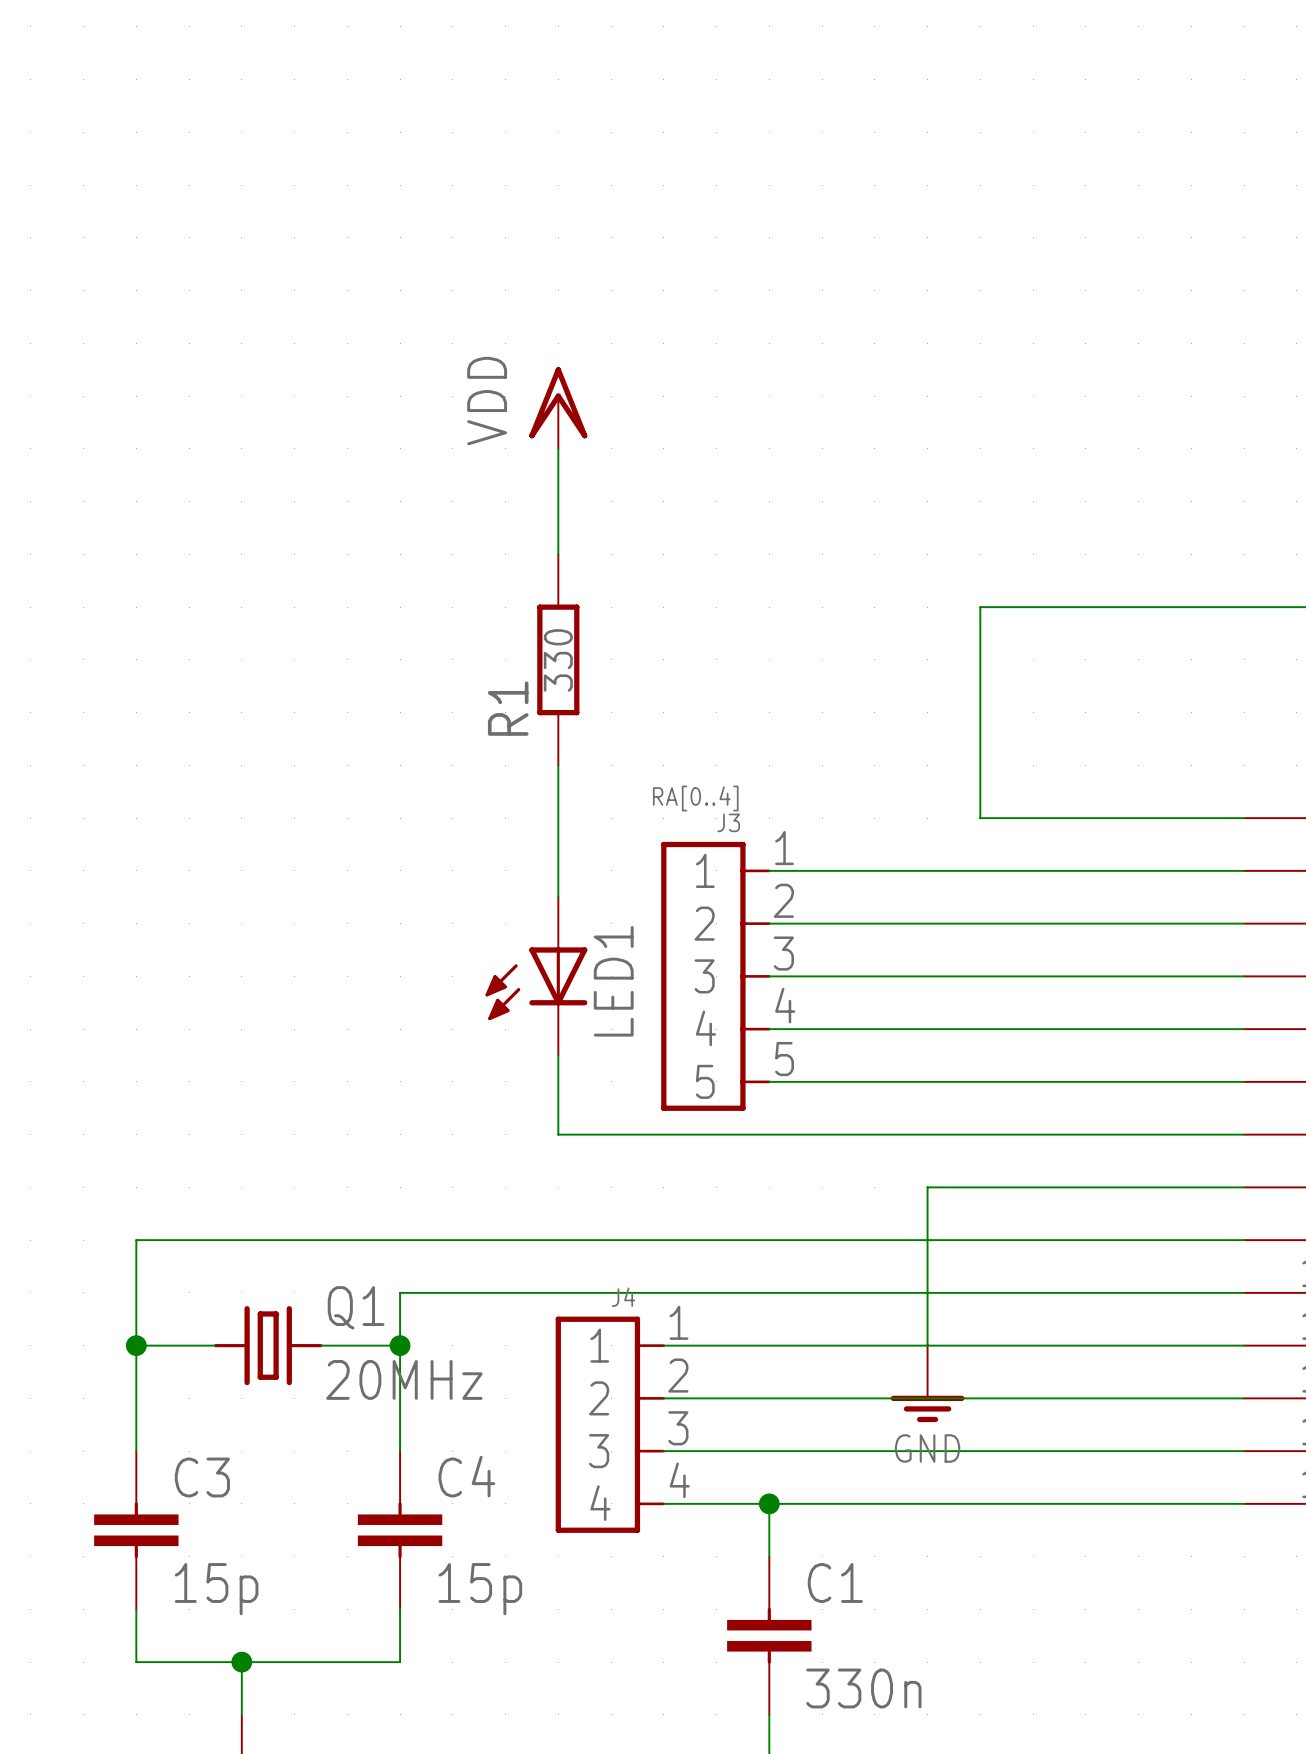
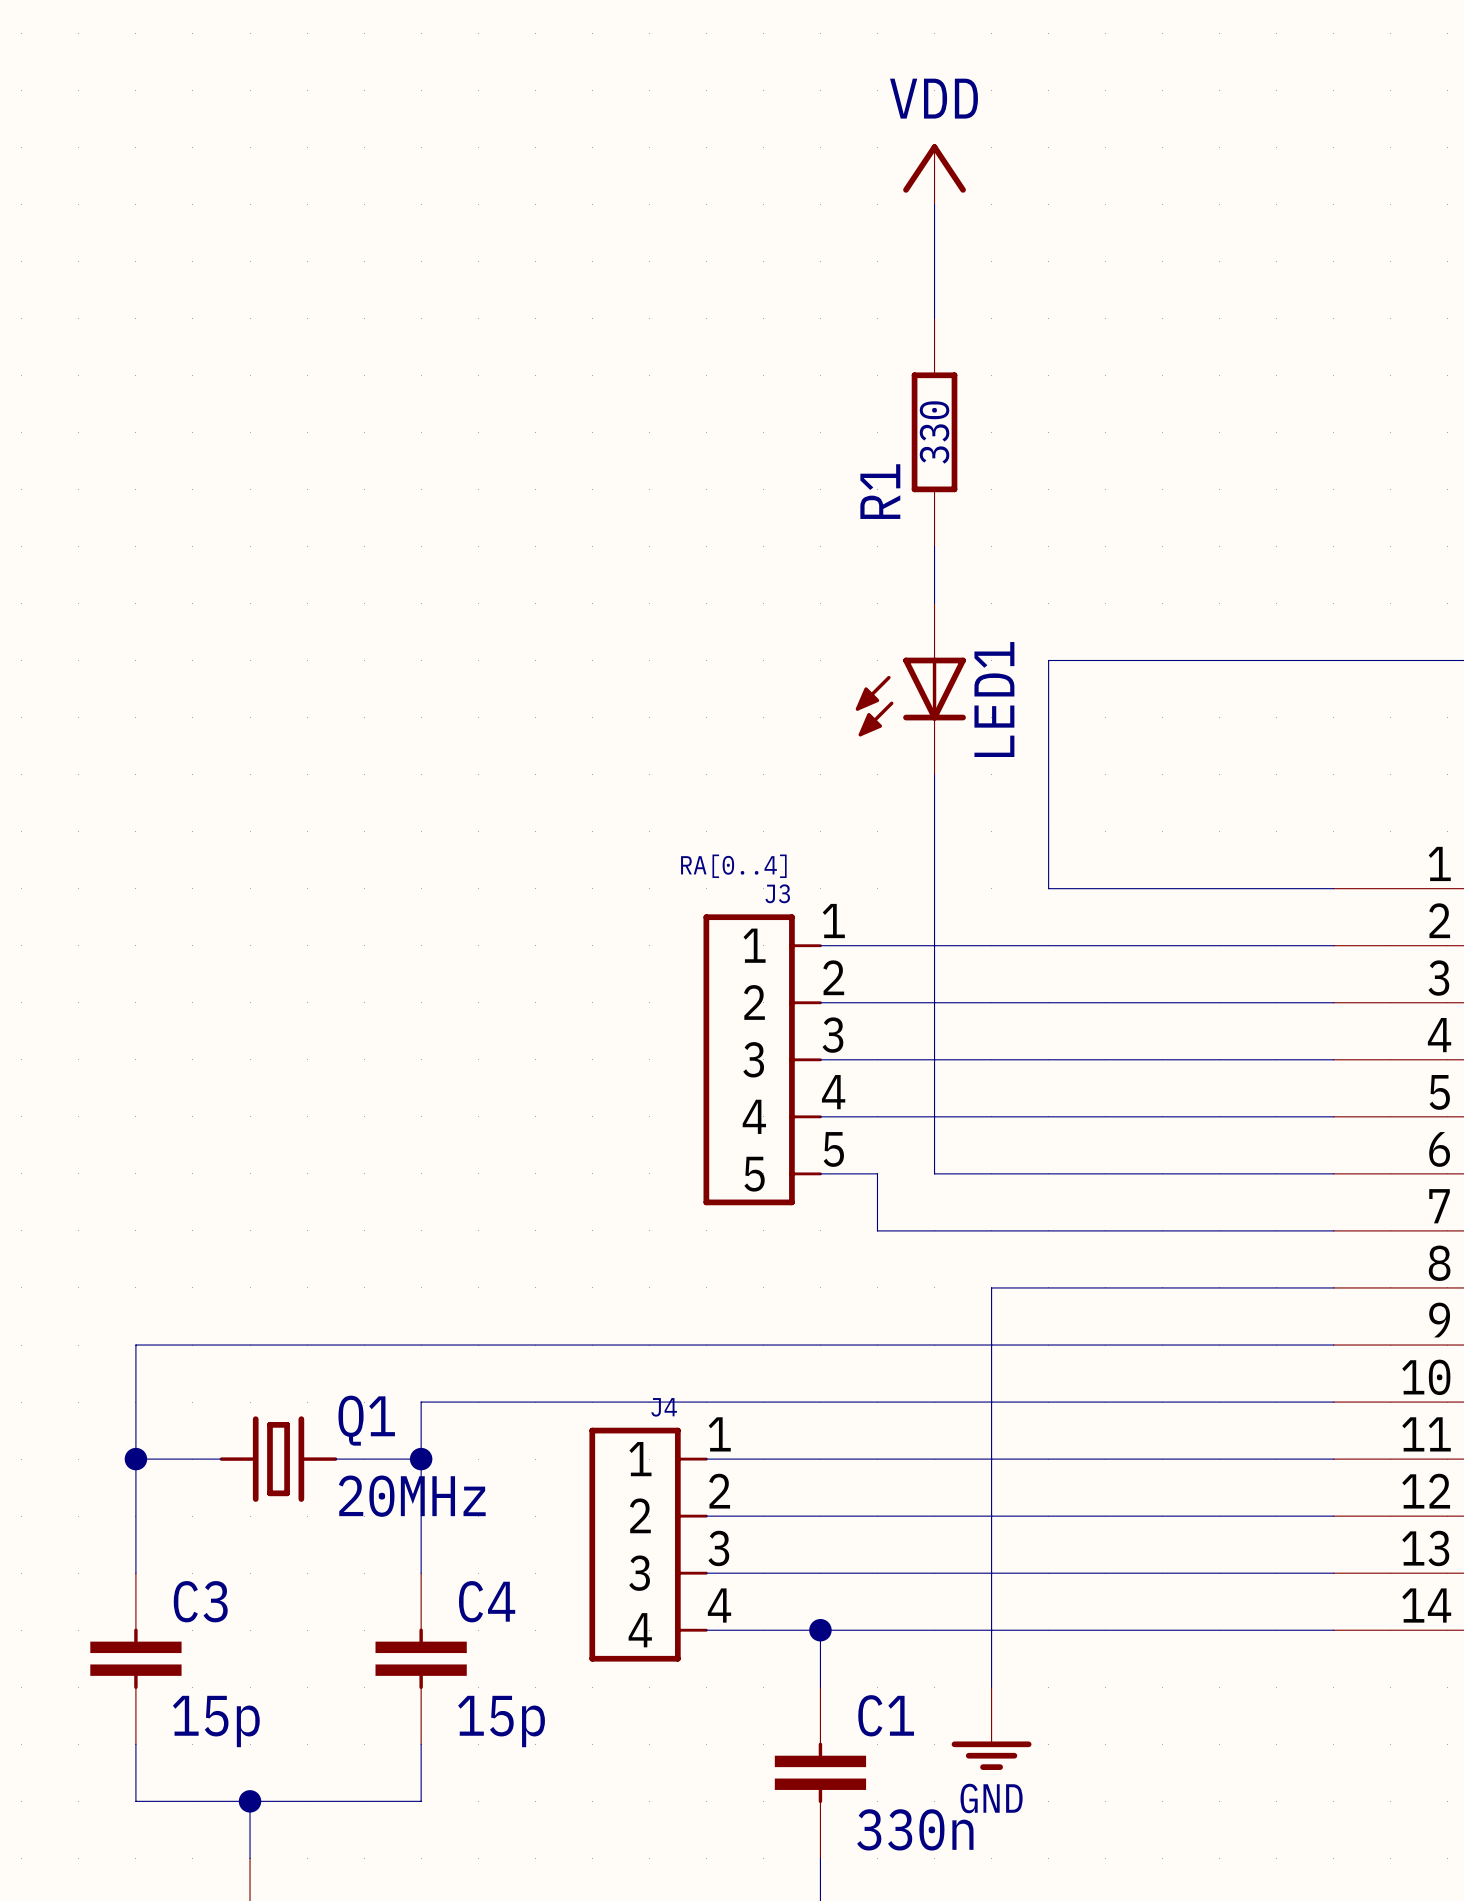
power symbol: none -> VDD (934, 174)
power symbol: VDD (558, 408) -> none
wire: (558, 448) (558, 554) -> (934, 204) (934, 318)
wire: none -> (934, 546) (934, 603)
R1 position: (558, 659) -> (934, 432)
wire: none -> (934, 774) (934, 1173)
wire: (558, 765) (558, 897) -> none
LED1 position: (536, 976) -> (910, 689)
wire: (558, 1055) (558, 1134) (822, 1134) -> none
wire: (822, 1081) (874, 1081) -> (877, 1173) (877, 1230)
wire: none -> (991, 1459) (991, 1687)
power symbol position: GND (927, 1383) -> GND (991, 1728)

